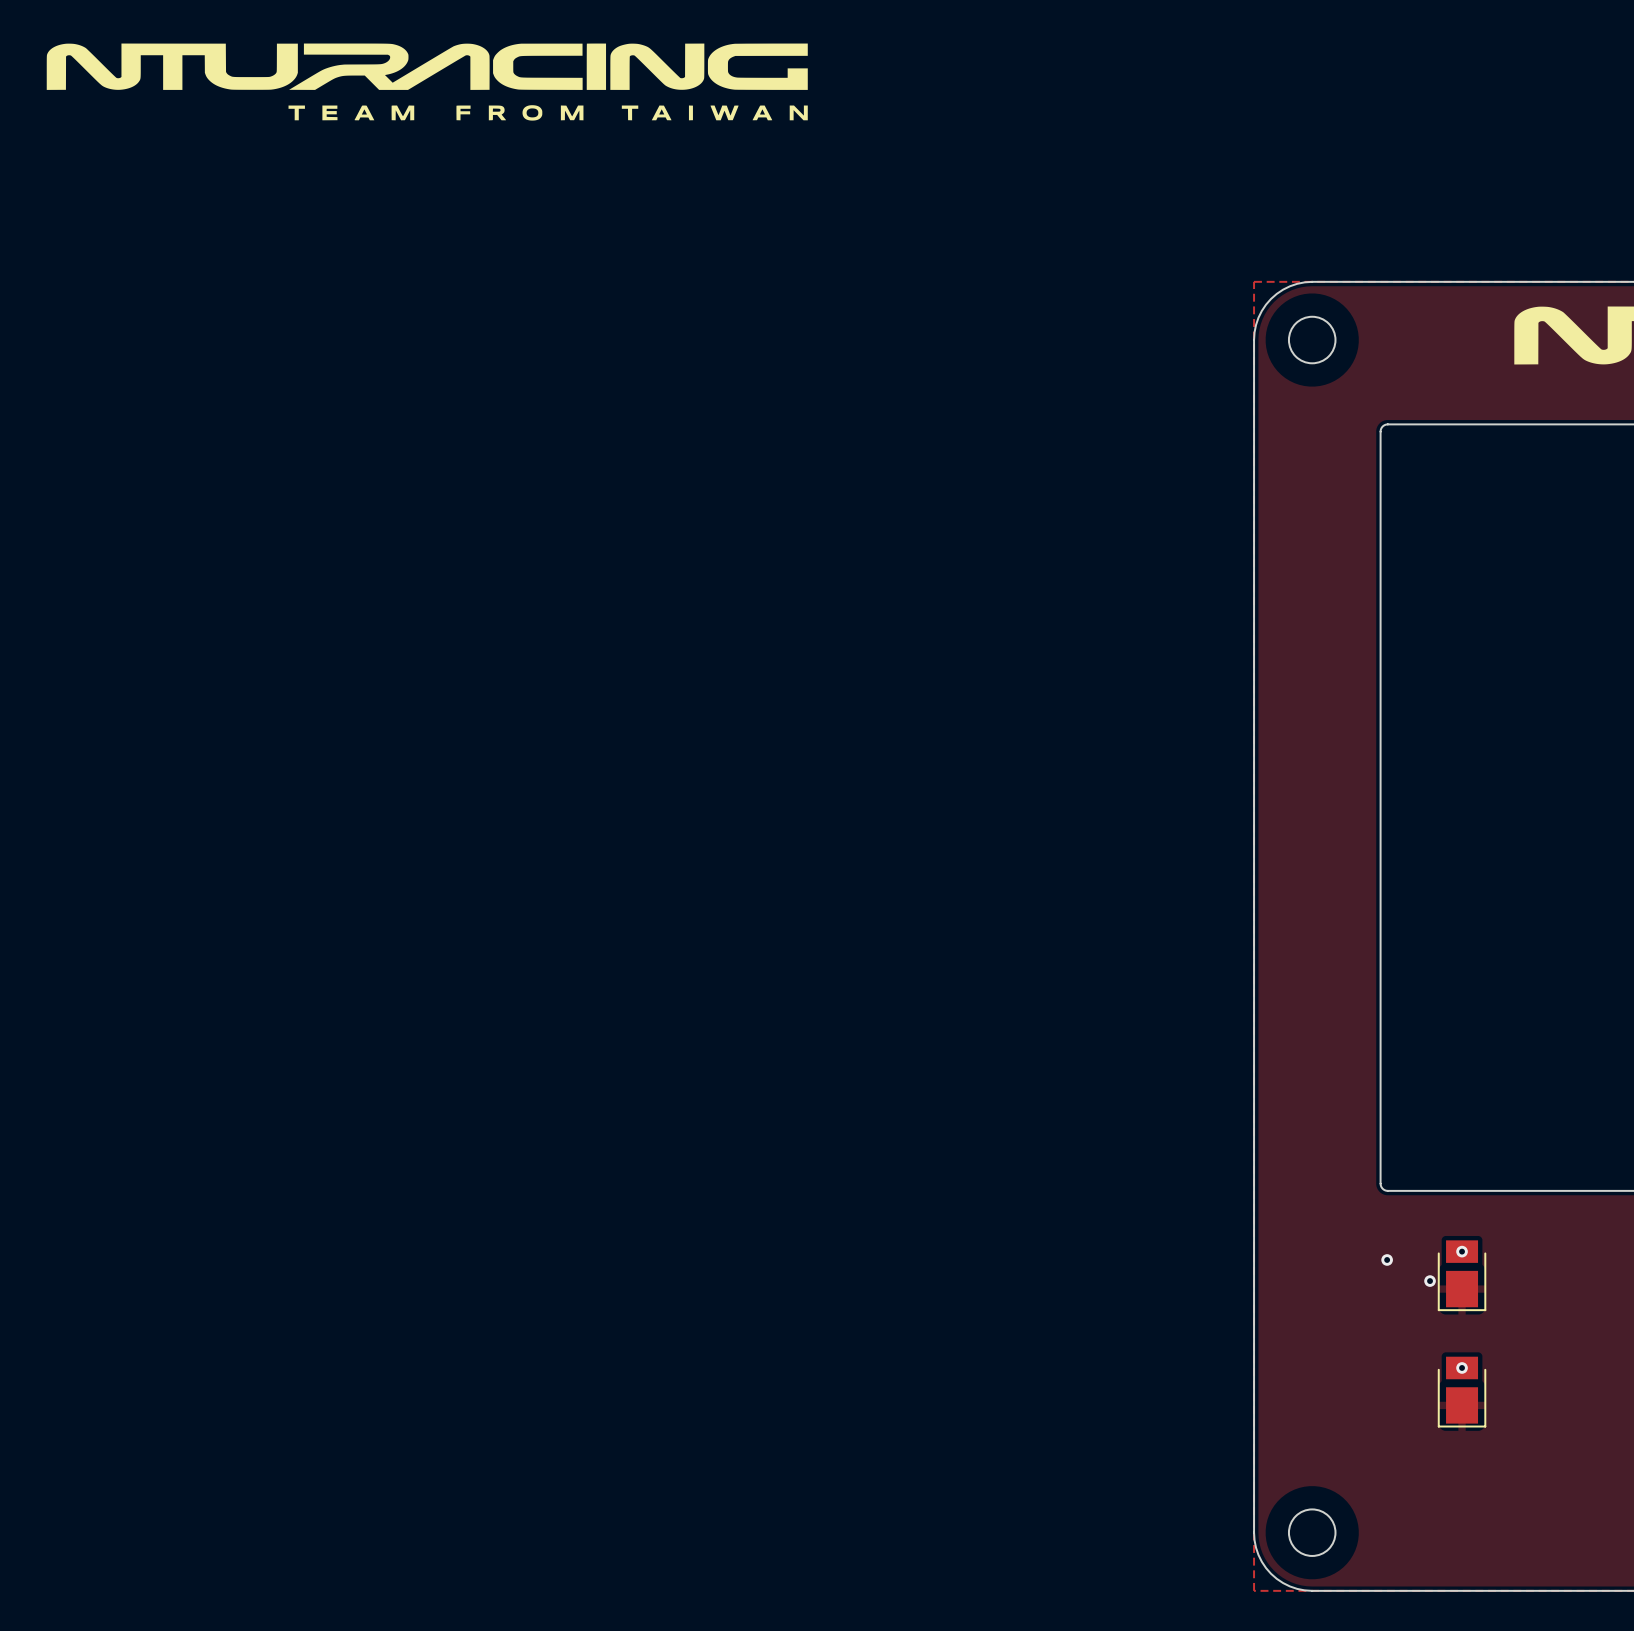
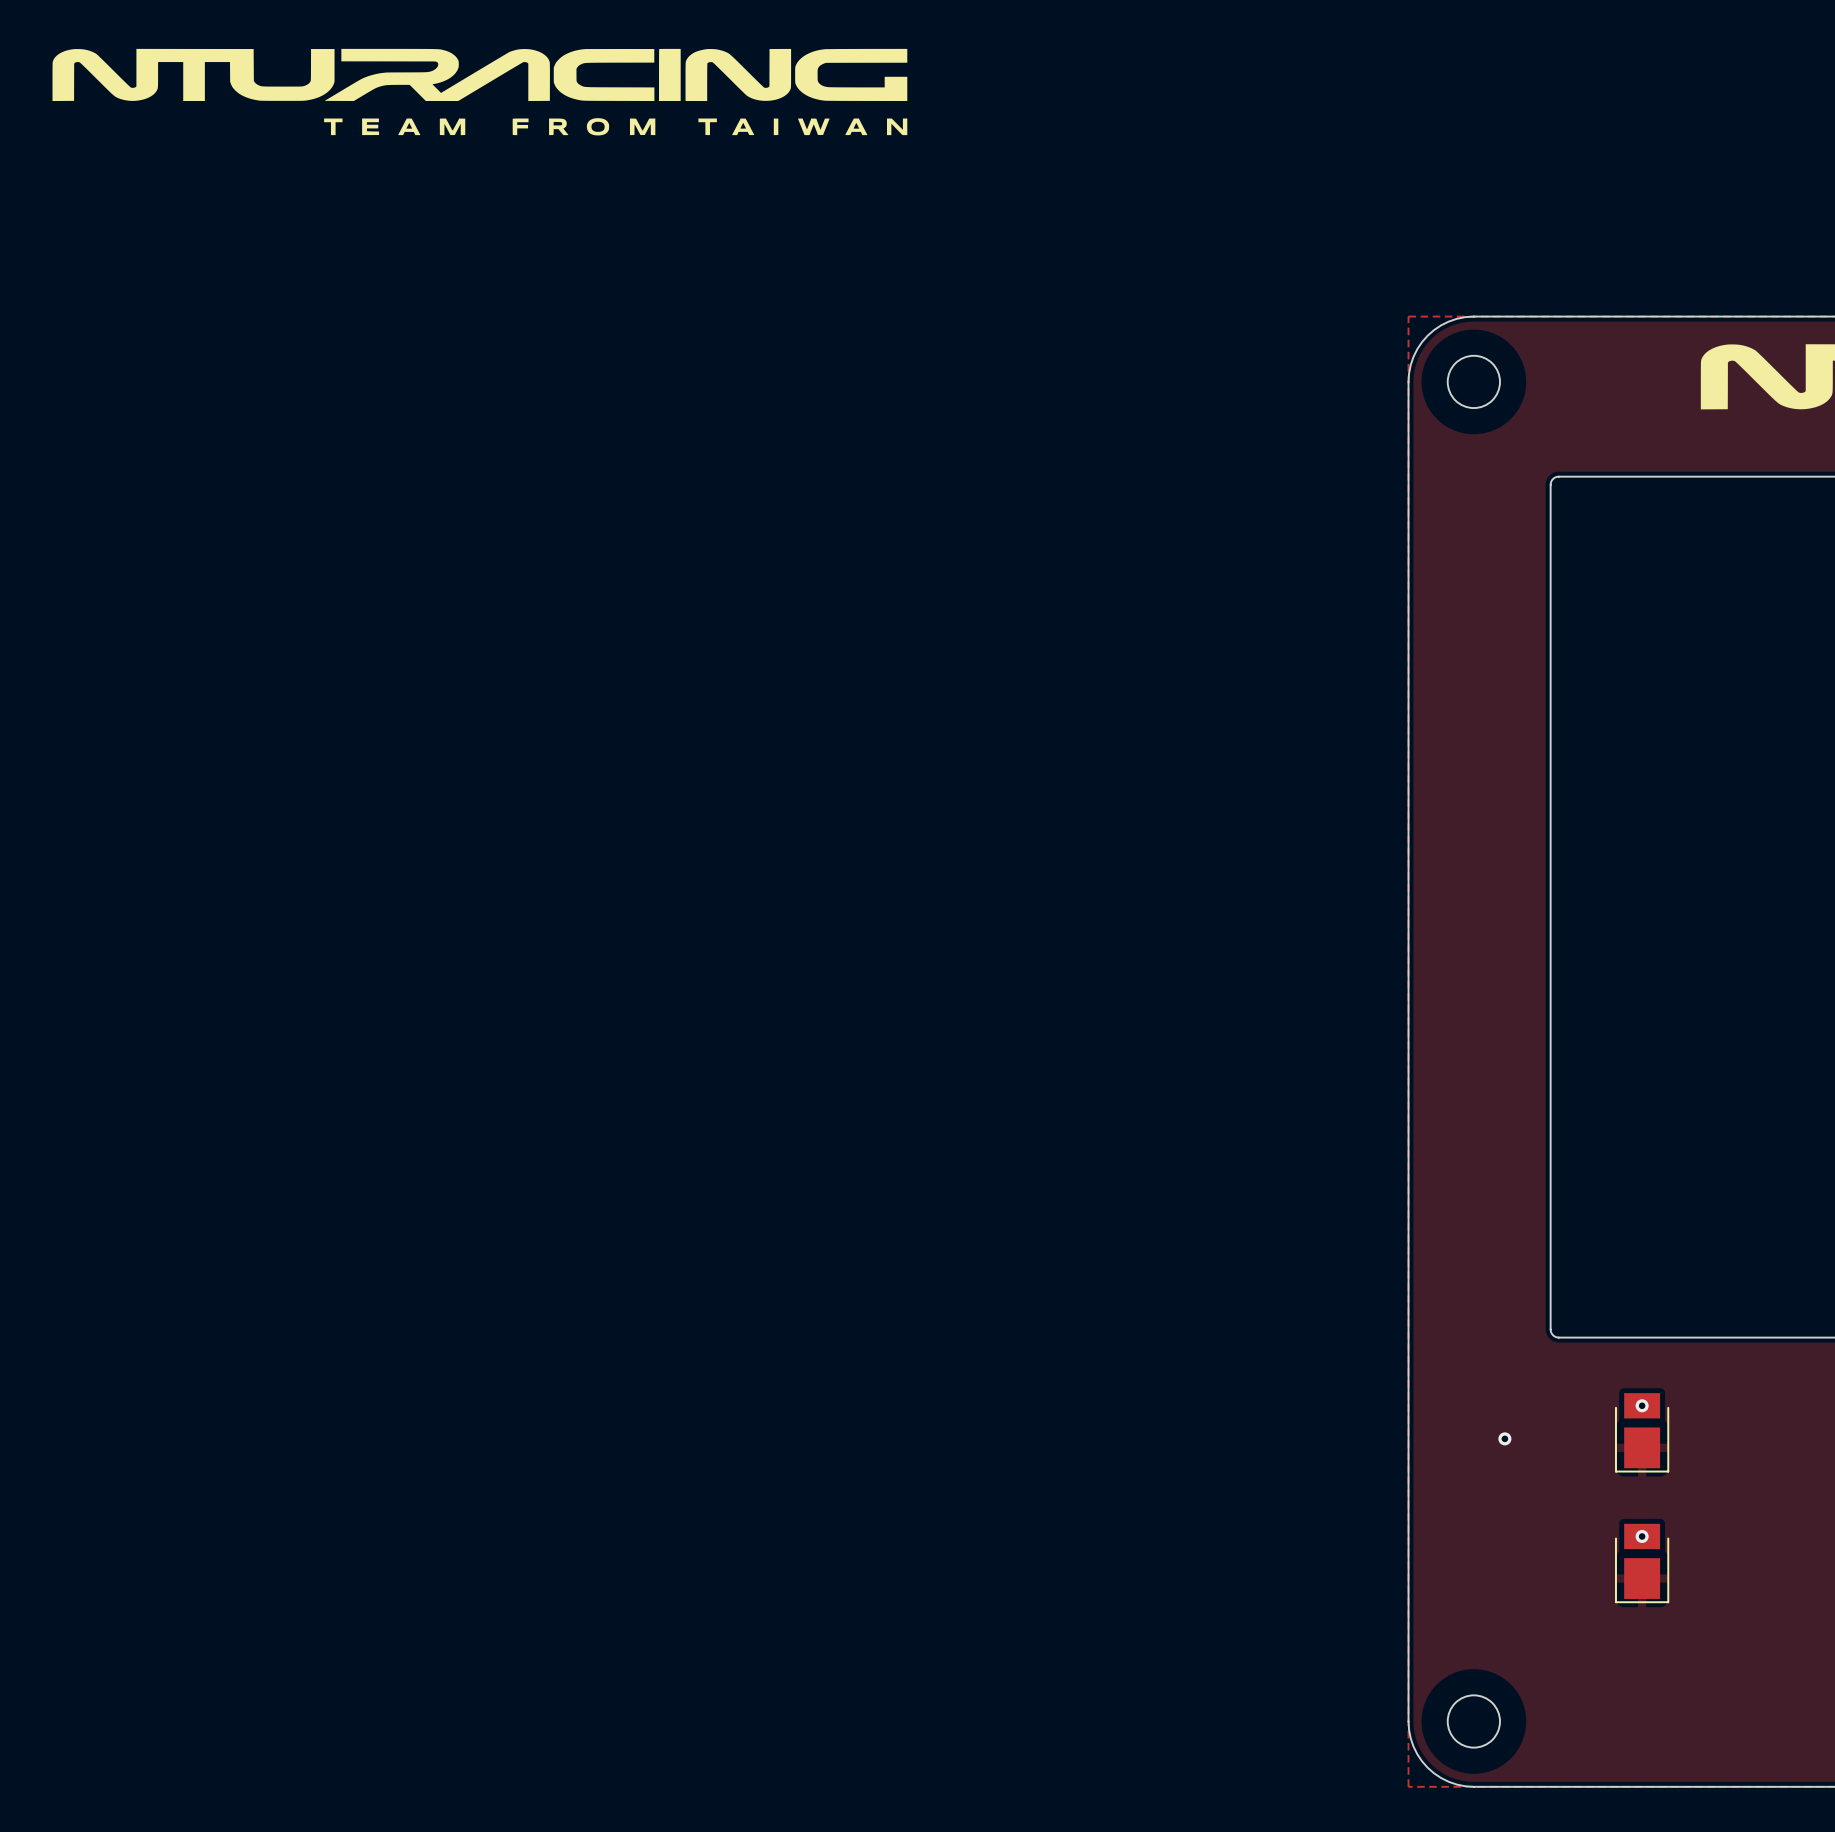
via: (1387, 1259) -> none
via: none -> (1504, 1438)
via: (1430, 1281) -> none

